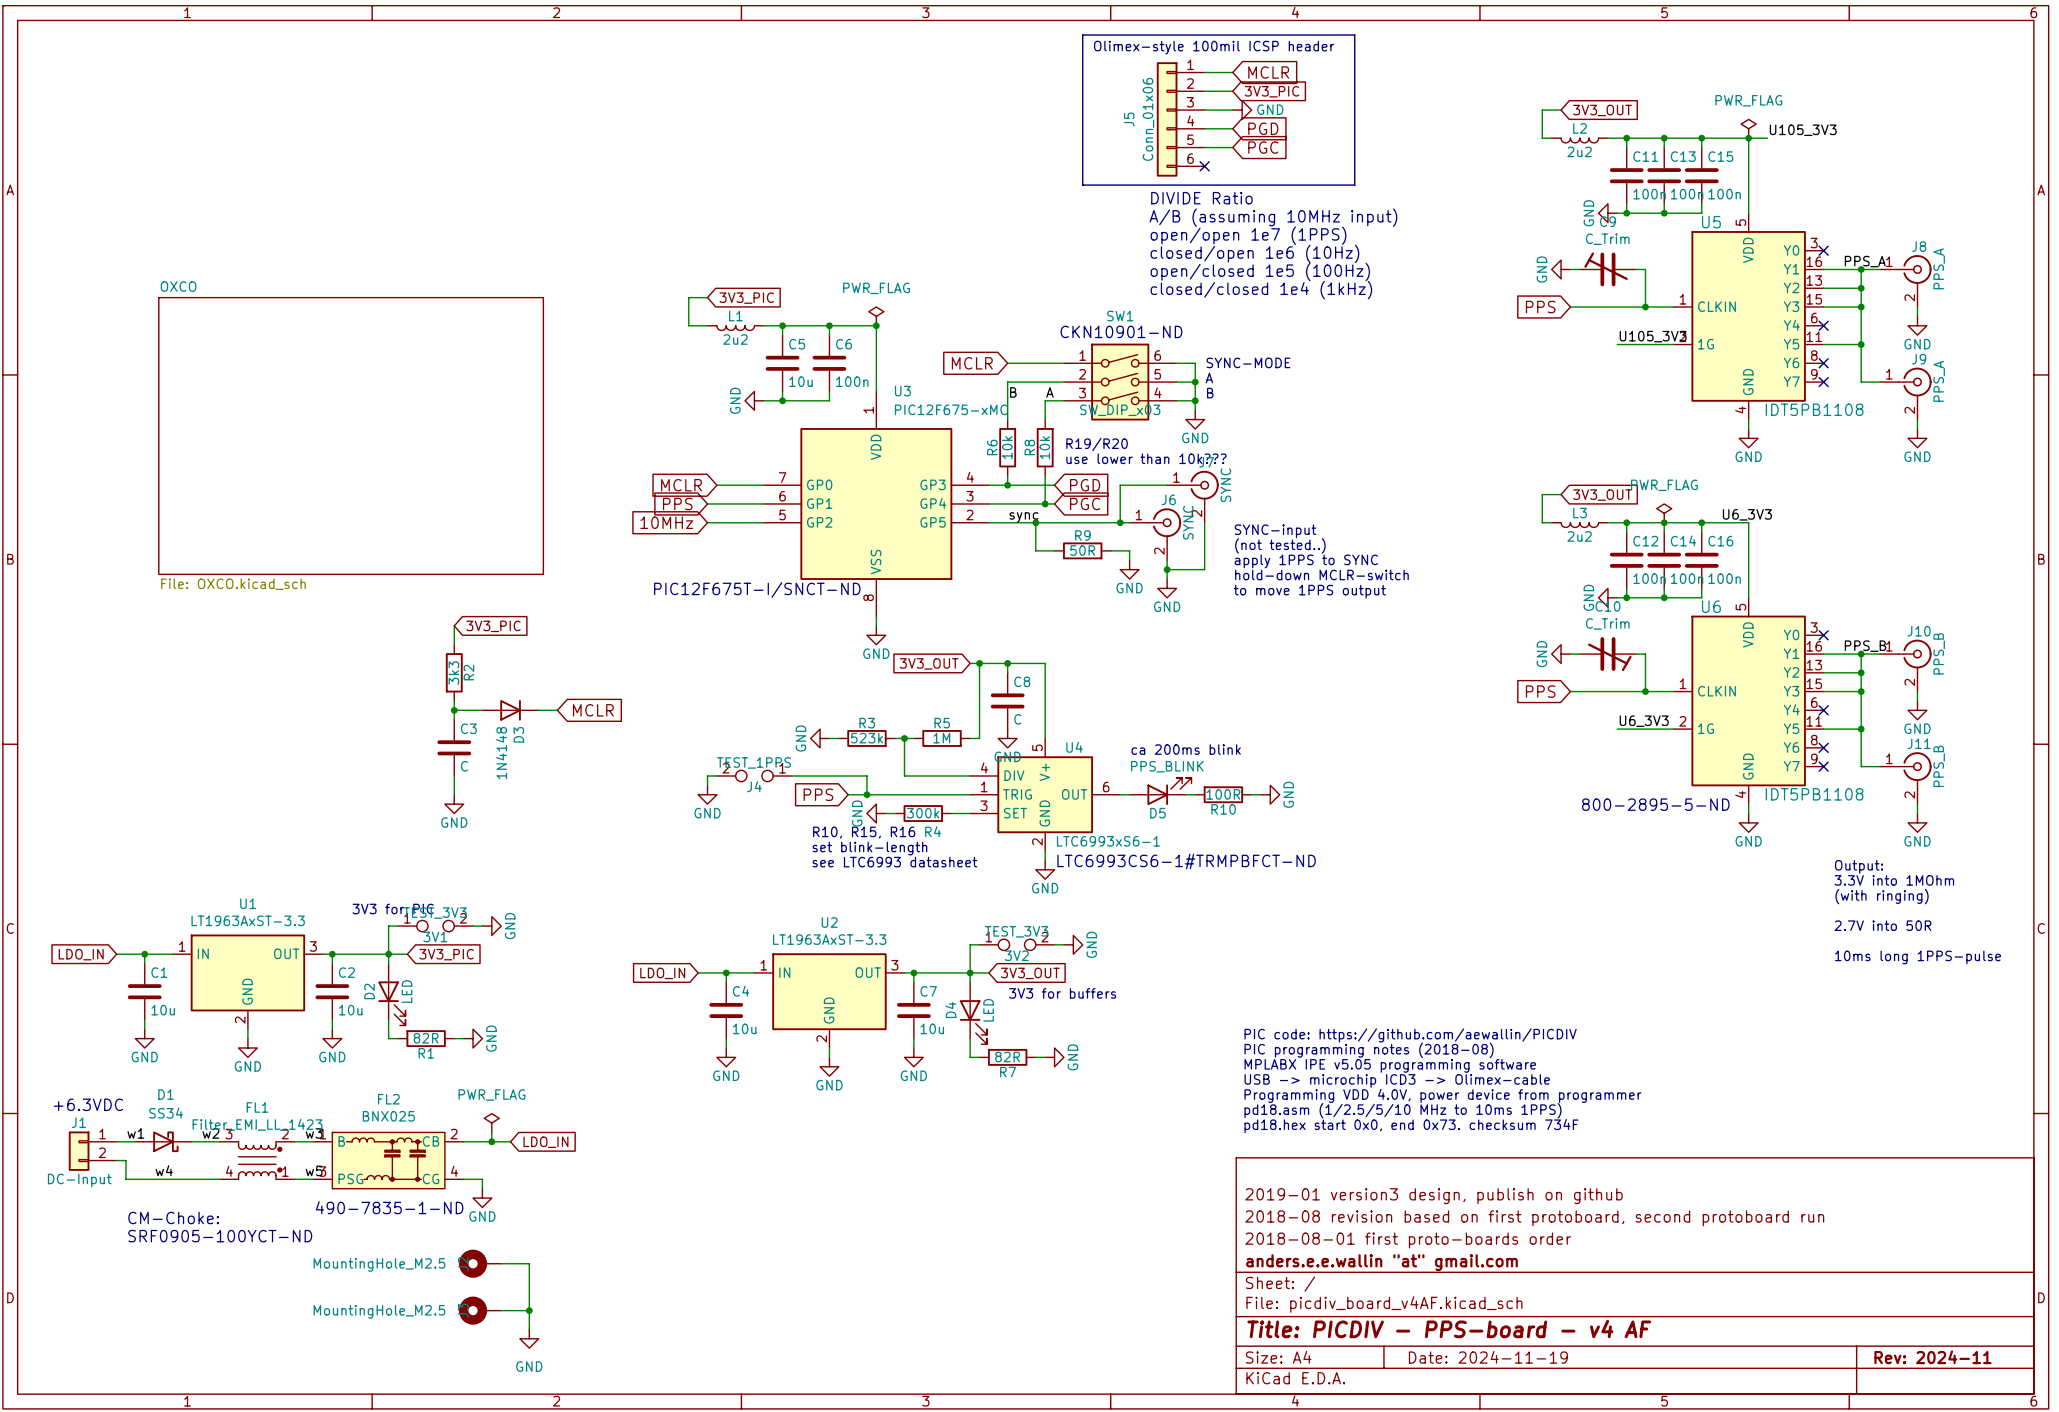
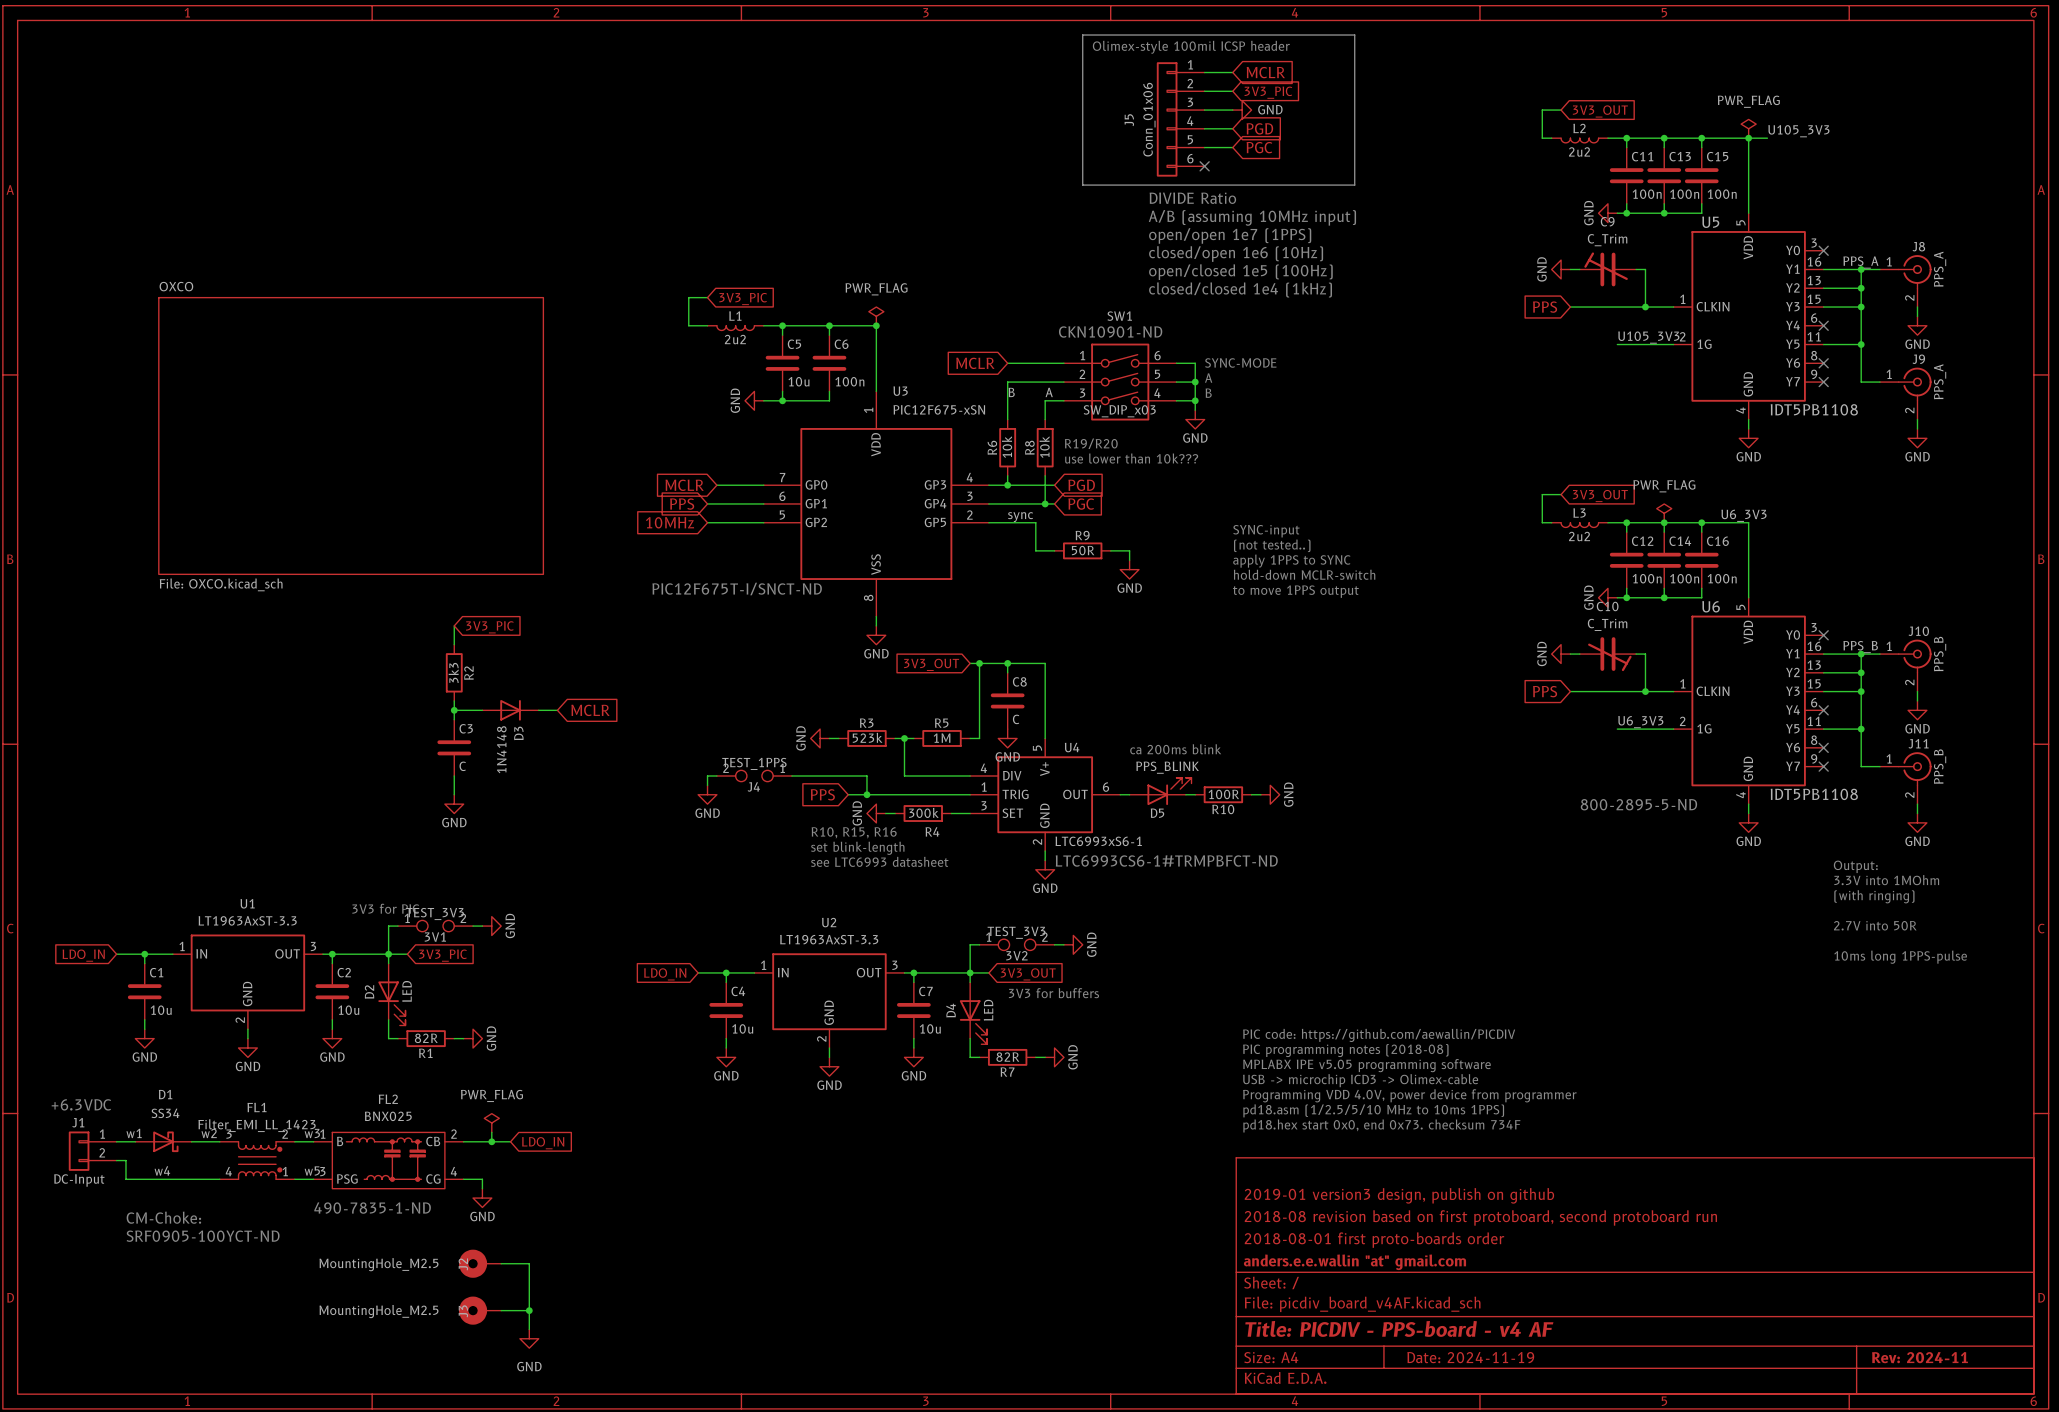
U3 value: PIC12F675-xMC (951, 409) -> PIC12F675-xSN (939, 409)
wire: (1167, 485) (1120, 485) (1120, 522) -> none
J7: SYNC (1192, 496) -> none
wire: (1035, 522) (1129, 522) -> none
junction: (1035, 522) -> none
junction: (1120, 522) -> none
wire: (1204, 522) (1204, 569) (1167, 569) -> none
J6: SYNC (1155, 534) -> none
wire: (1167, 560) (1167, 579) -> none
junction: (1167, 569) -> none
power symbol: GND (1167, 588) -> none

